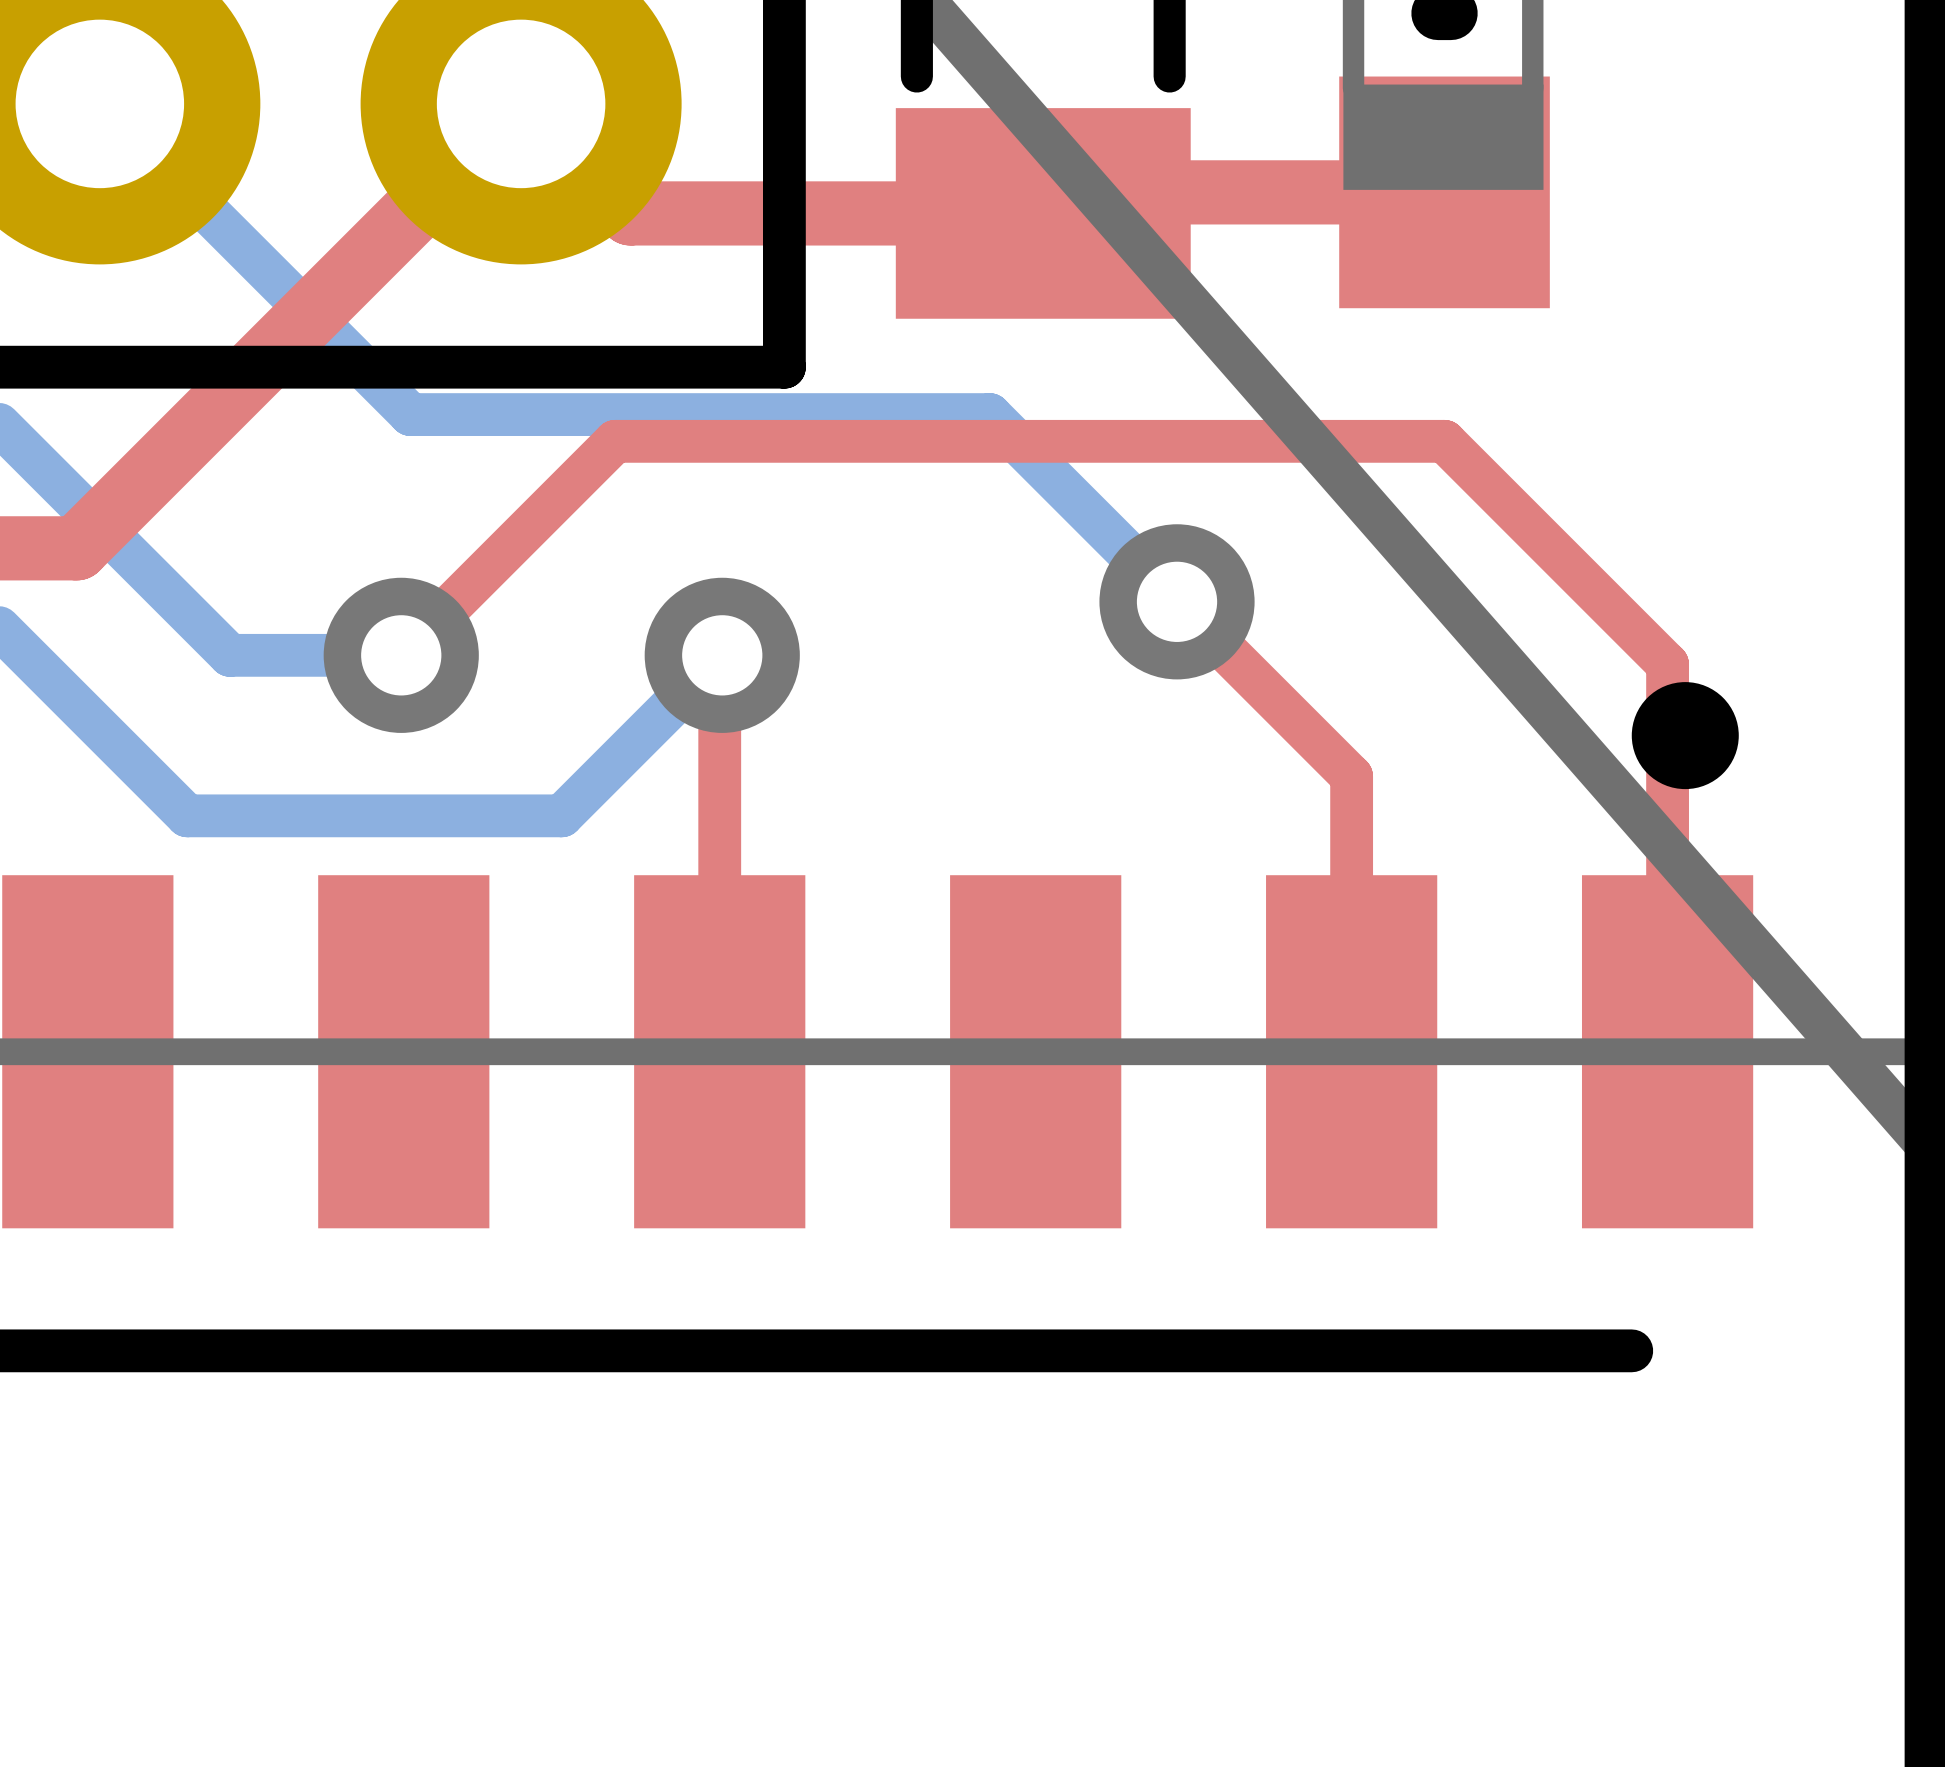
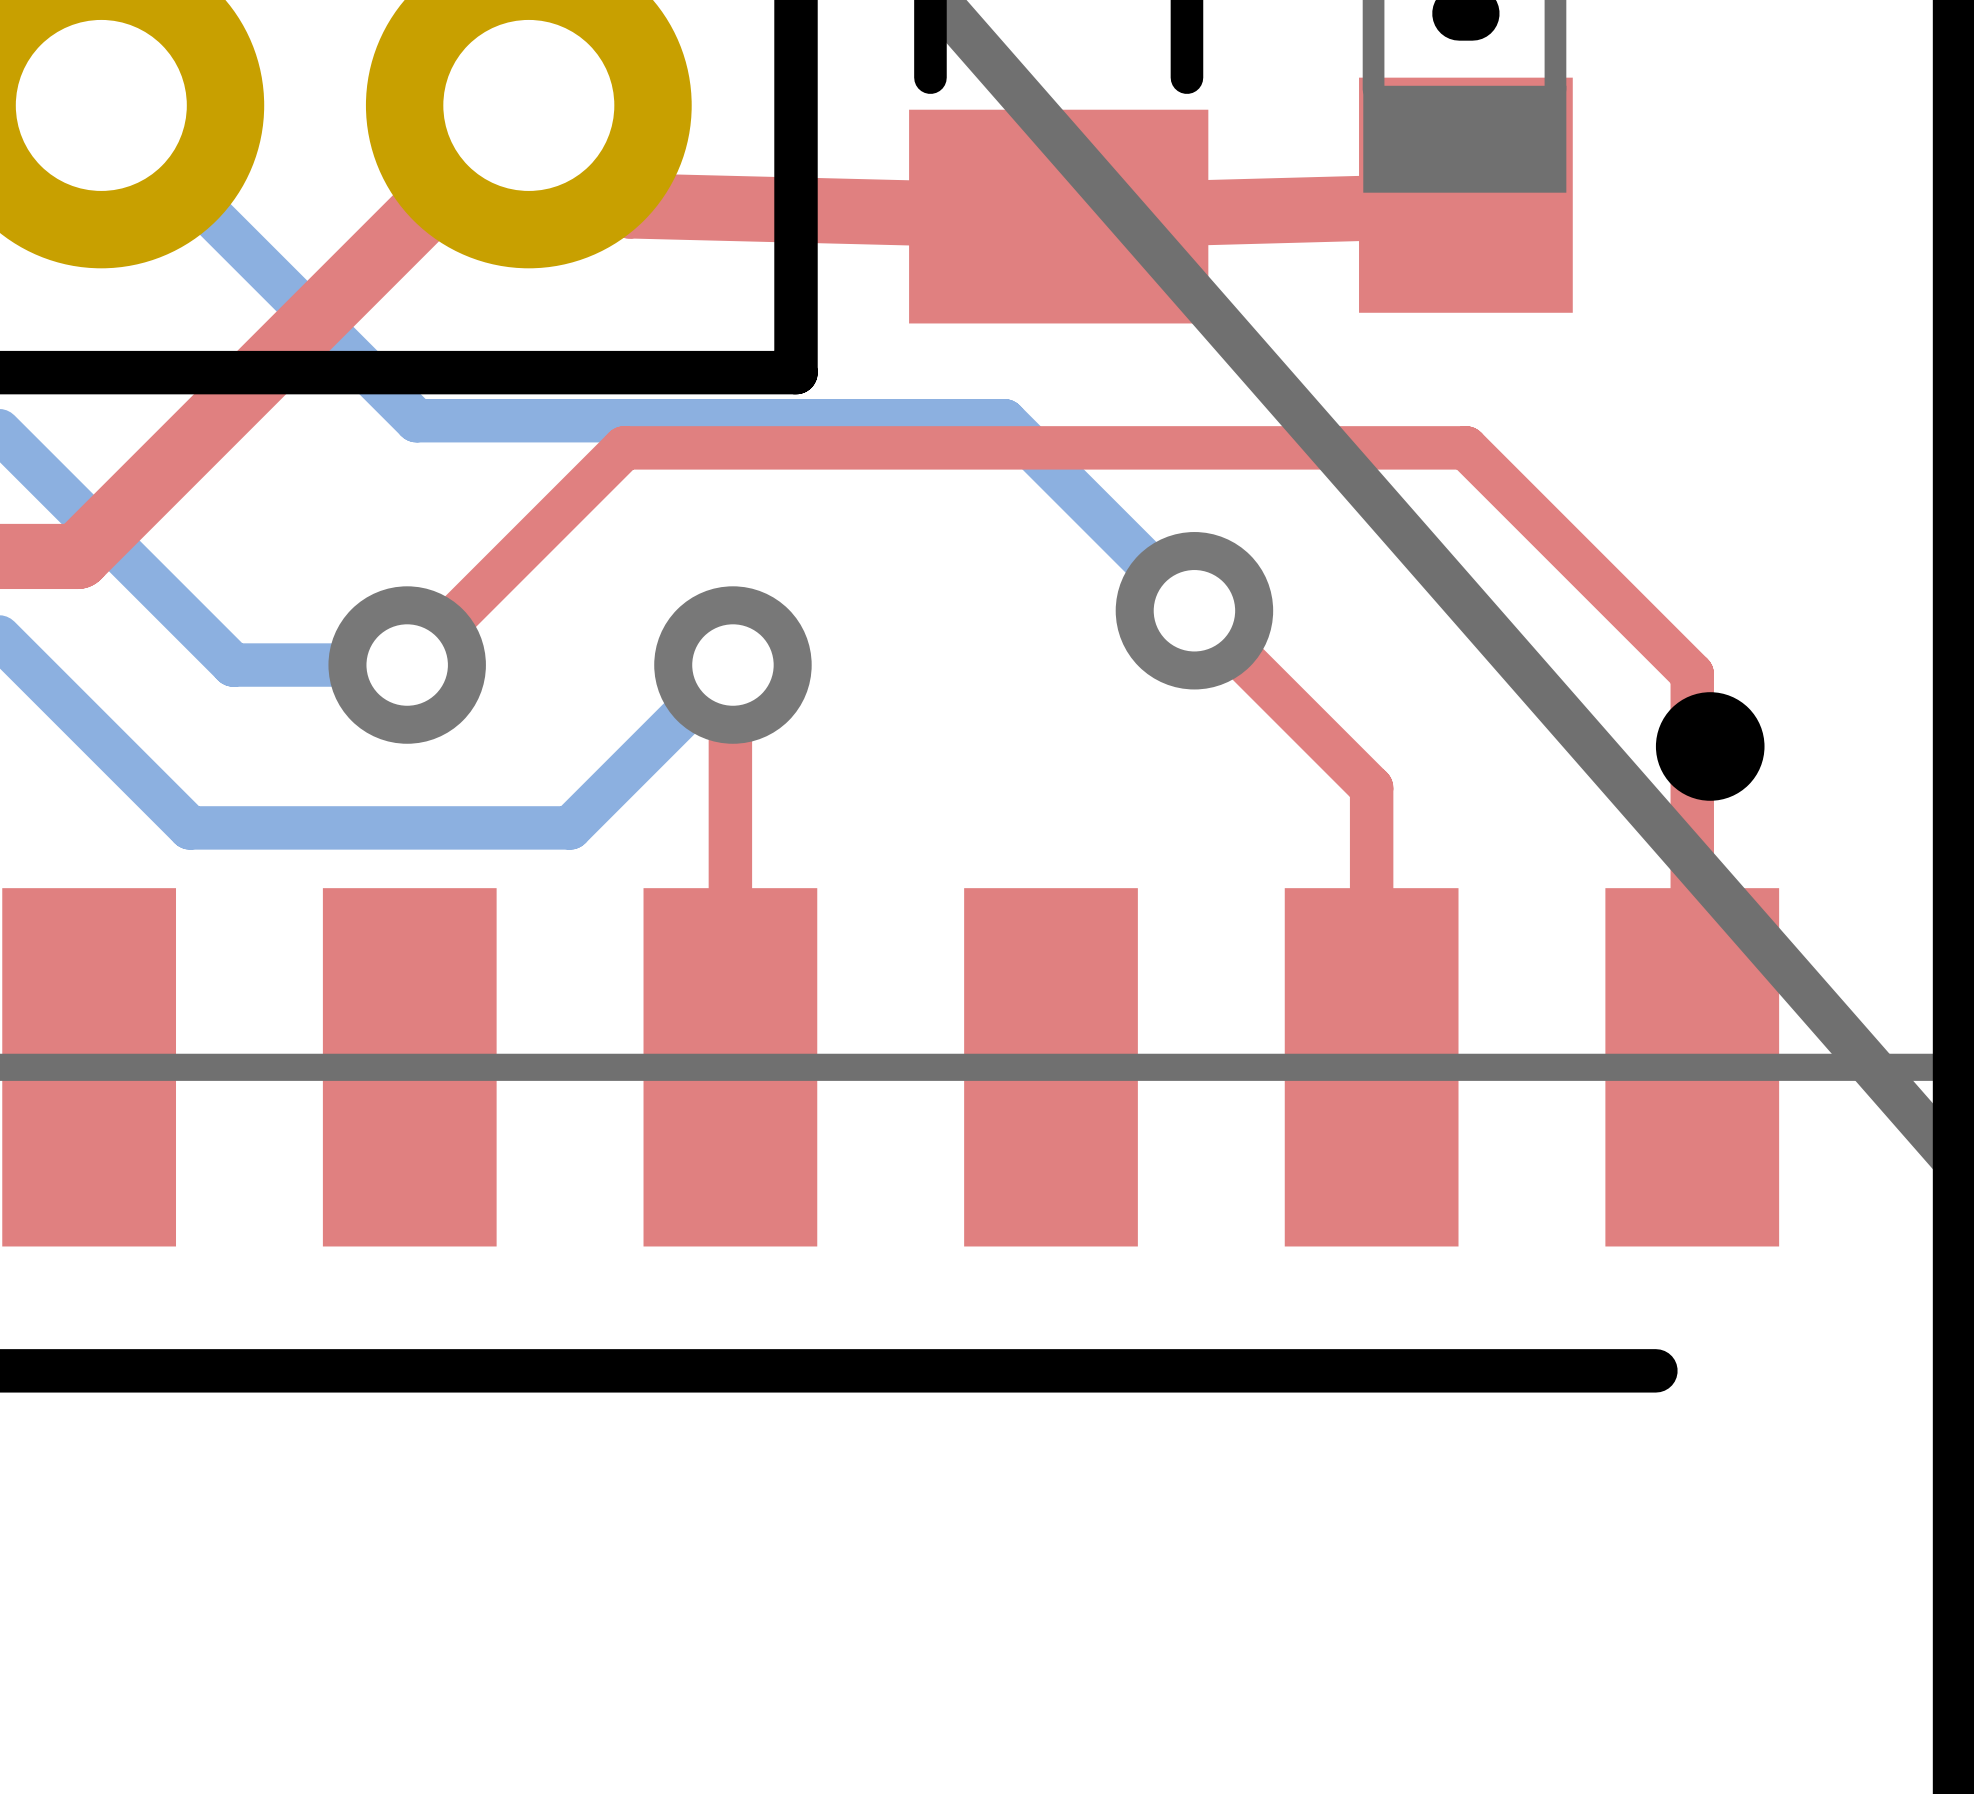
top track: (1444, 192) (1064, 192) (1043, 213) (630, 213) (620, 202) -> (1455, 205) (1058, 216) (629, 205)

